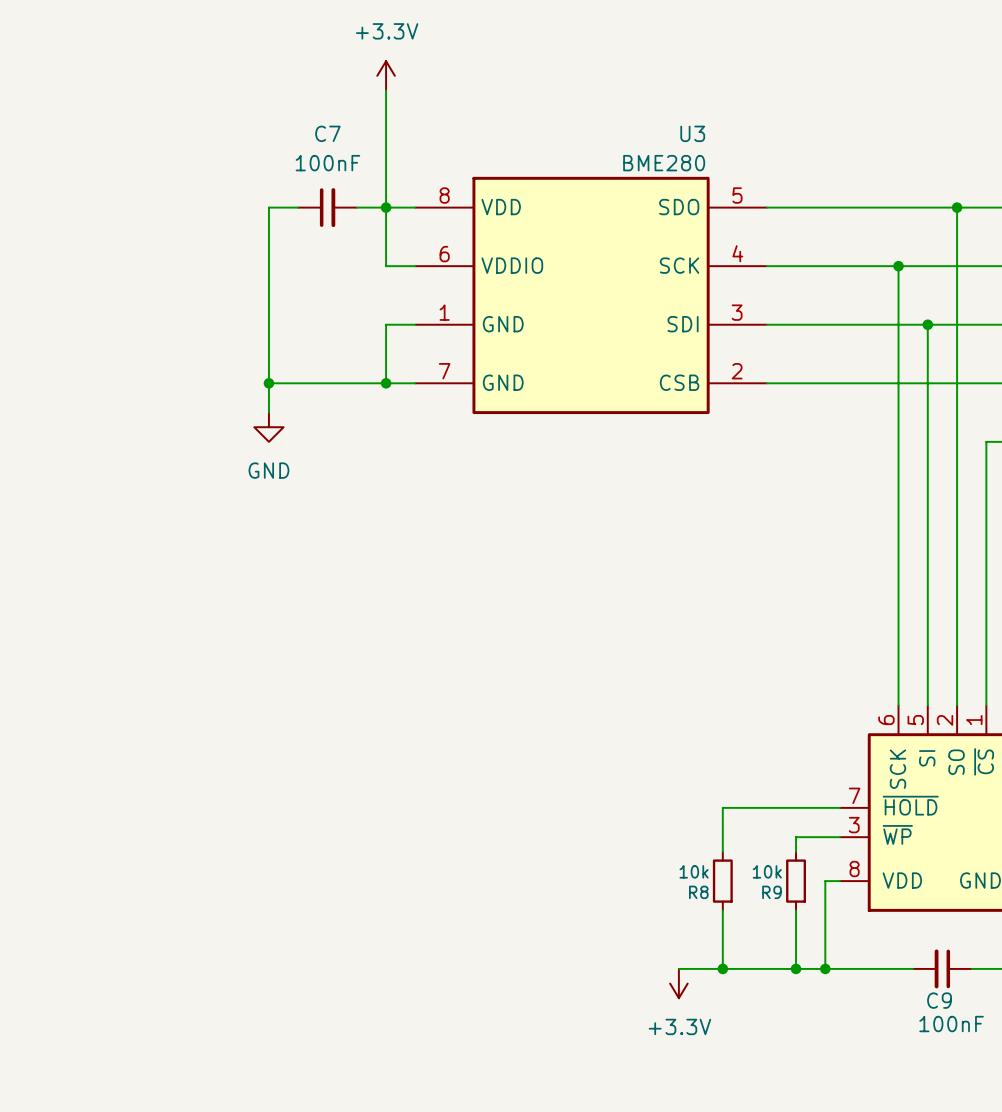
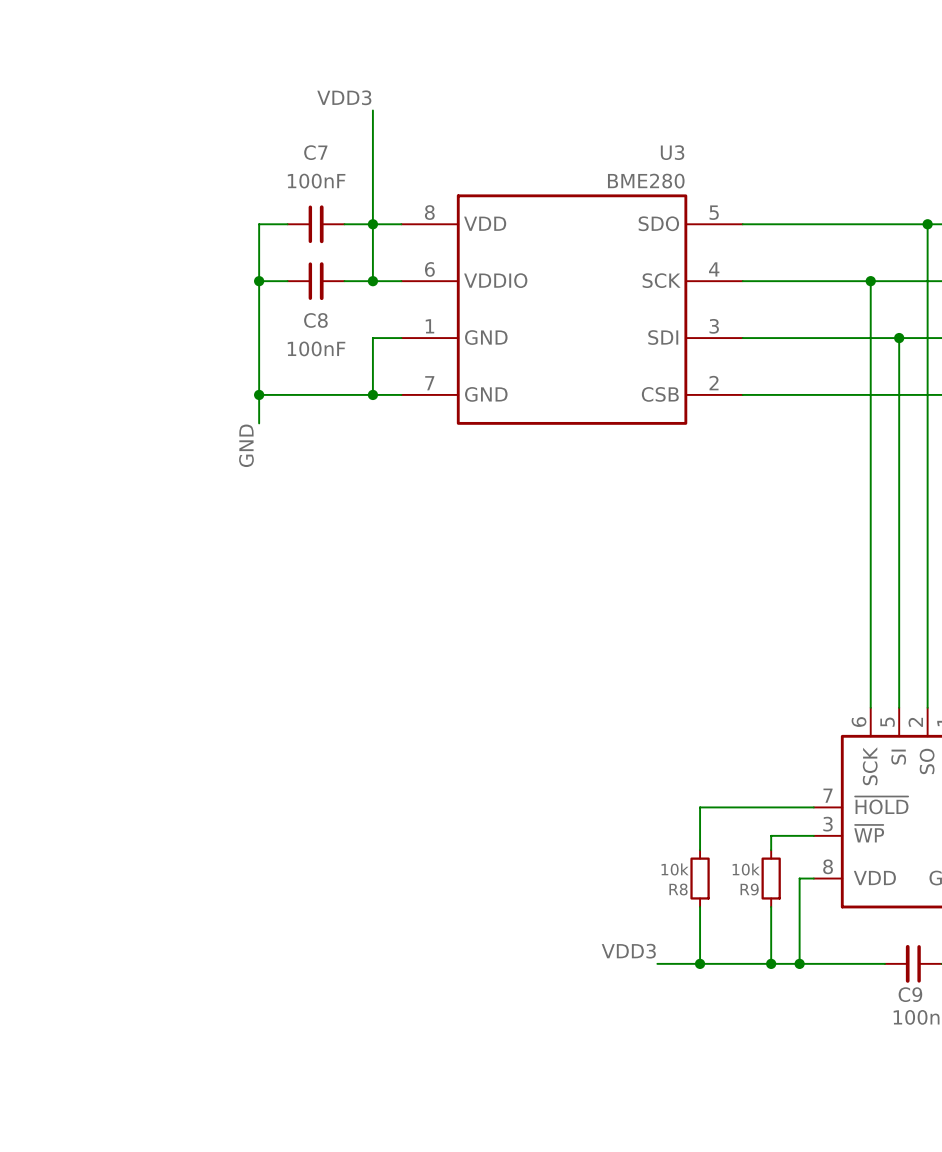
power symbol: +3.3V (386, 75) -> none
label: none -> VDD3 (344, 97)
wire: none -> (259, 281) (287, 281)
junction: none -> (259, 281)
C8: none -> 100nF (316, 281)
wire: none -> (344, 281) (372, 281)
junction: none -> (372, 281)
power symbol: GND (268, 427) -> none
label: none -> GND (246, 445)
label: none -> VDD3 (628, 951)
power symbol: +3.3V (678, 983) -> none

